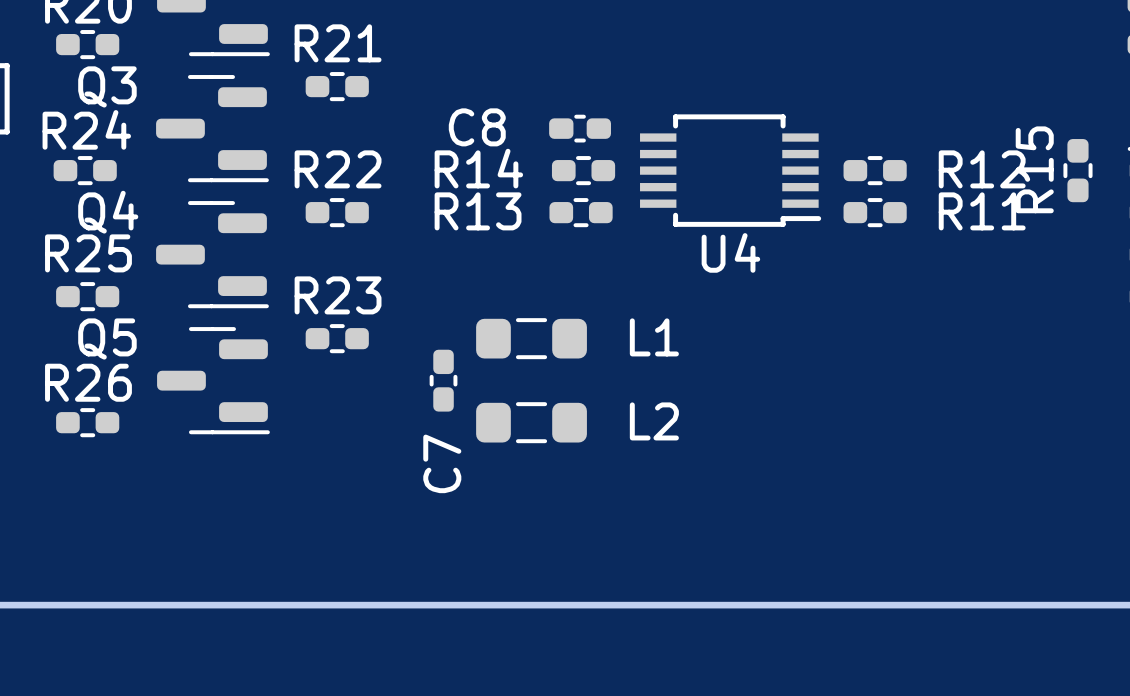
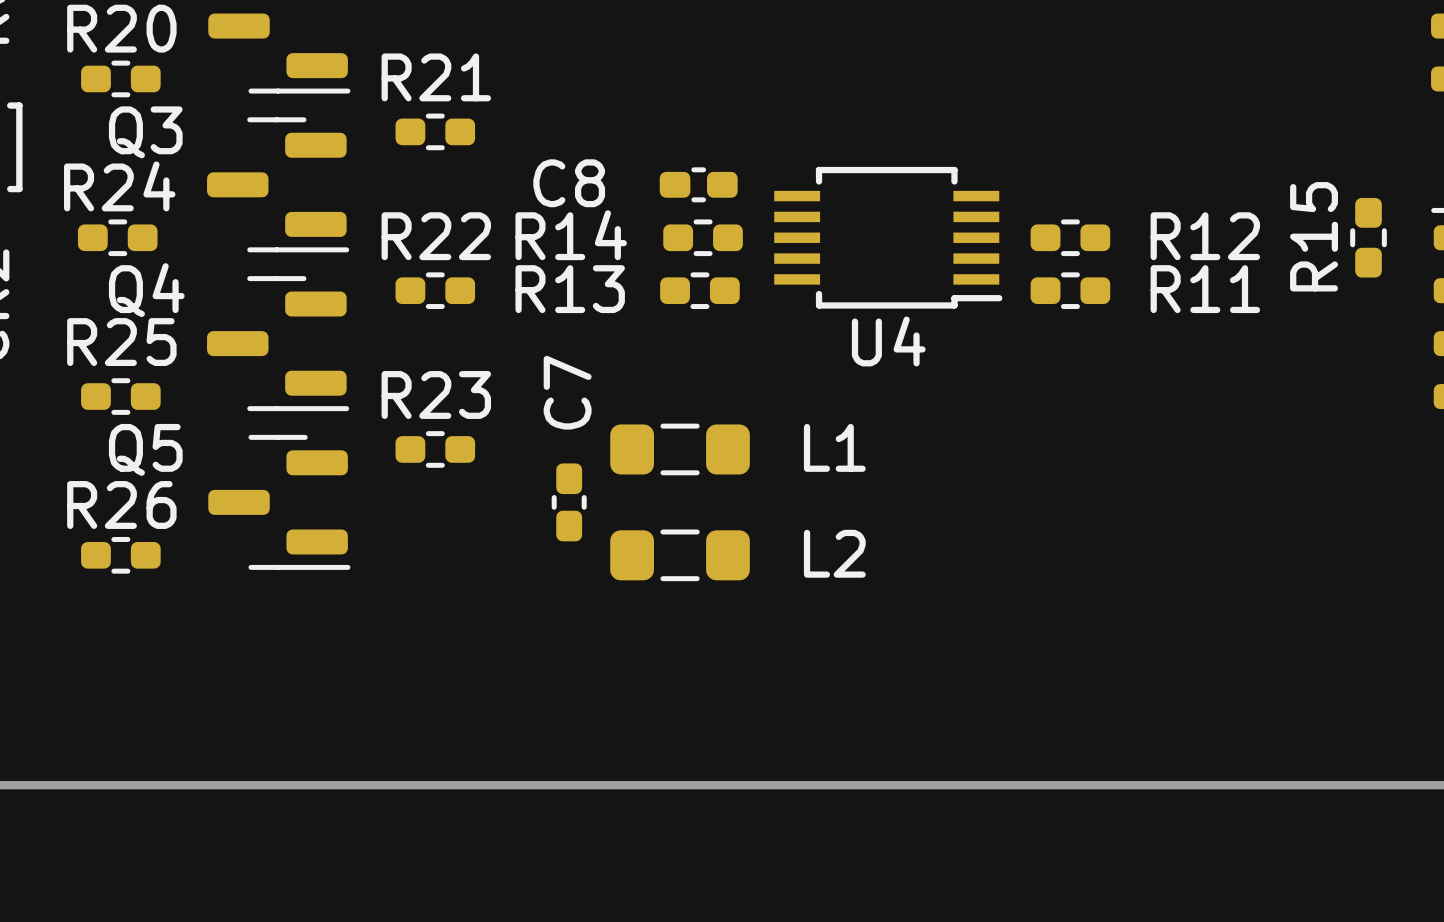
C8 position: (580, 128) -> (698, 184)
R14 position: (583, 170) -> (703, 237)
U4 position: (730, 170) -> (888, 237)
R12 position: (875, 170) -> (1070, 237)
R13 position: (581, 212) -> (699, 290)
R11 position: (875, 212) -> (1070, 290)
C7 name position: C7 (442, 463) -> C7 (567, 392)

